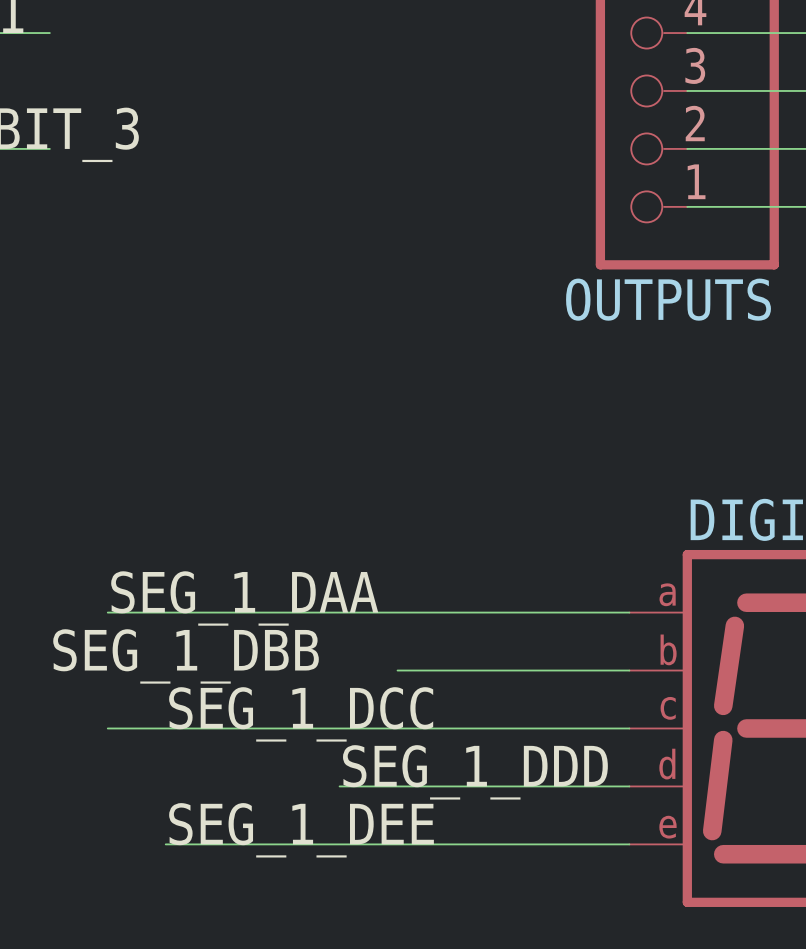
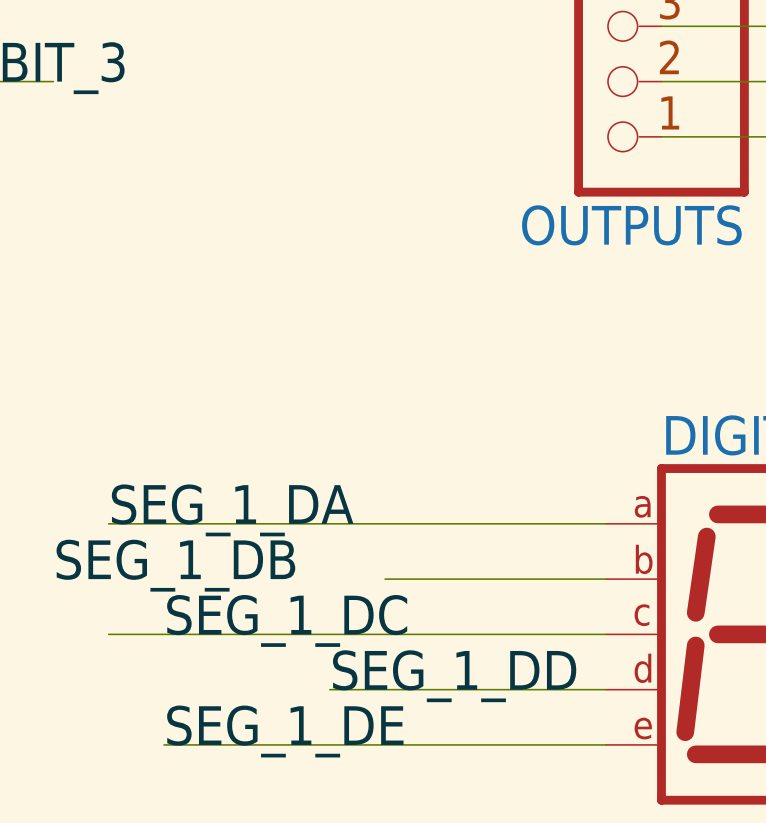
label: SEG_1_DAA (244, 598) -> SEG_1_DA (232, 510)
label: SEG_1_DBB (186, 656) -> SEG_1_DB (175, 565)
label: SEG_1_DCC (301, 714) -> SEG_1_DC (287, 620)
label: SEG_1_DDD (475, 772) -> SEG_1_DD (454, 676)
label: SEG_1_DEE (301, 830) -> SEG_1_DE (285, 731)

